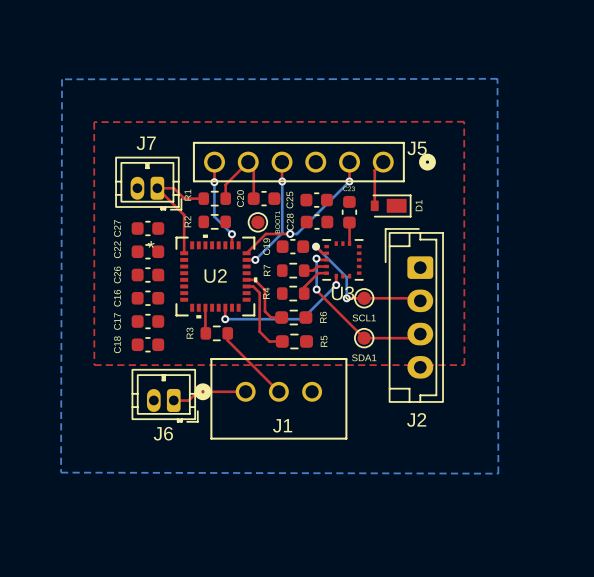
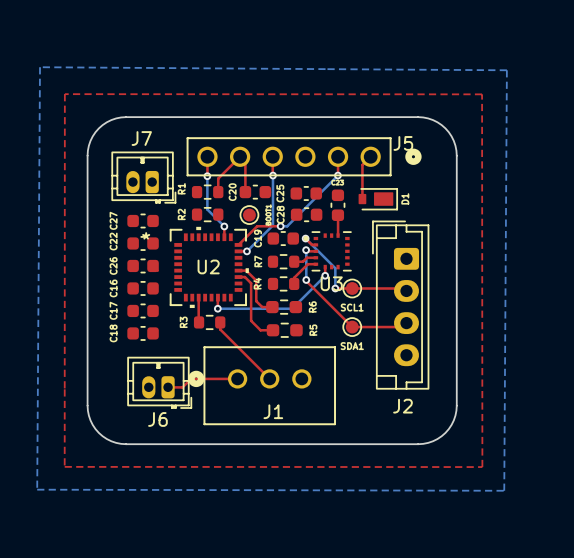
bottom zone outline: (497, 78) (498, 473) (61, 472) (62, 79) (497, 78) -> (40, 67) (37, 489) (504, 490) (506, 70) (40, 67)
board edge: none -> (126, 117) (418, 117) (432, 120) (445, 128) (453, 140) (456, 155) (456, 405) (453, 420) (445, 432) (432, 441) (418, 444) (126, 444) (111, 441) (98, 432) (90, 420) (87, 405) (87, 150) (92, 136) (98, 128) (111, 120) (126, 117)
top zone outline: (464, 121) (464, 365) (94, 365) (94, 122) (464, 121) -> (64, 94) (64, 466) (482, 467) (482, 94) (64, 94)
top track: (203, 198) (184, 198) (173, 188) (157, 188) (184, 215) (184, 253) -> none

